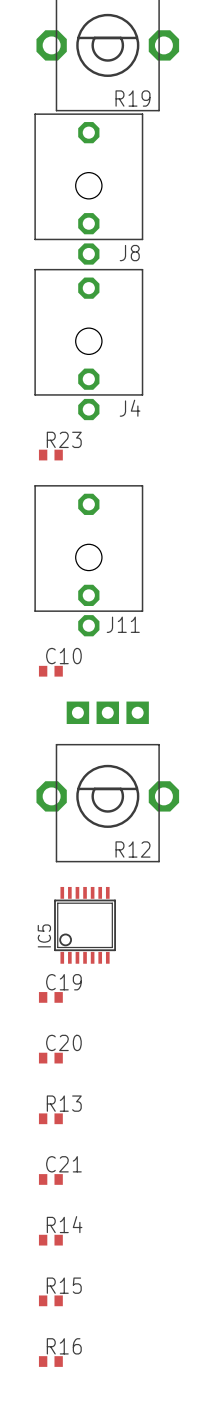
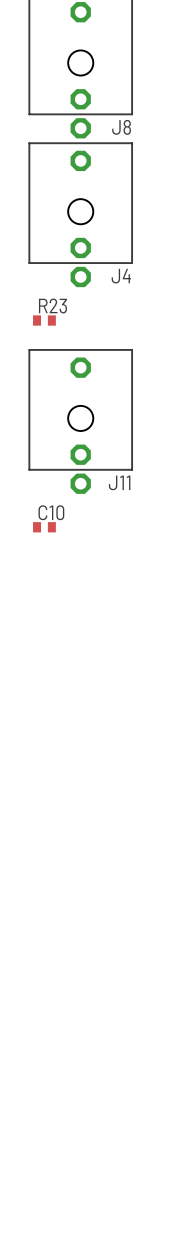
R12: (107, 781) -> none
IC5: (85, 925) -> none
C19: (50, 997) -> none
C20: (50, 1058) -> none
R13: (50, 1118) -> none
C21: (50, 1179) -> none
R14: (50, 1240) -> none
R15: (50, 1300) -> none
R16: (50, 1361) -> none

